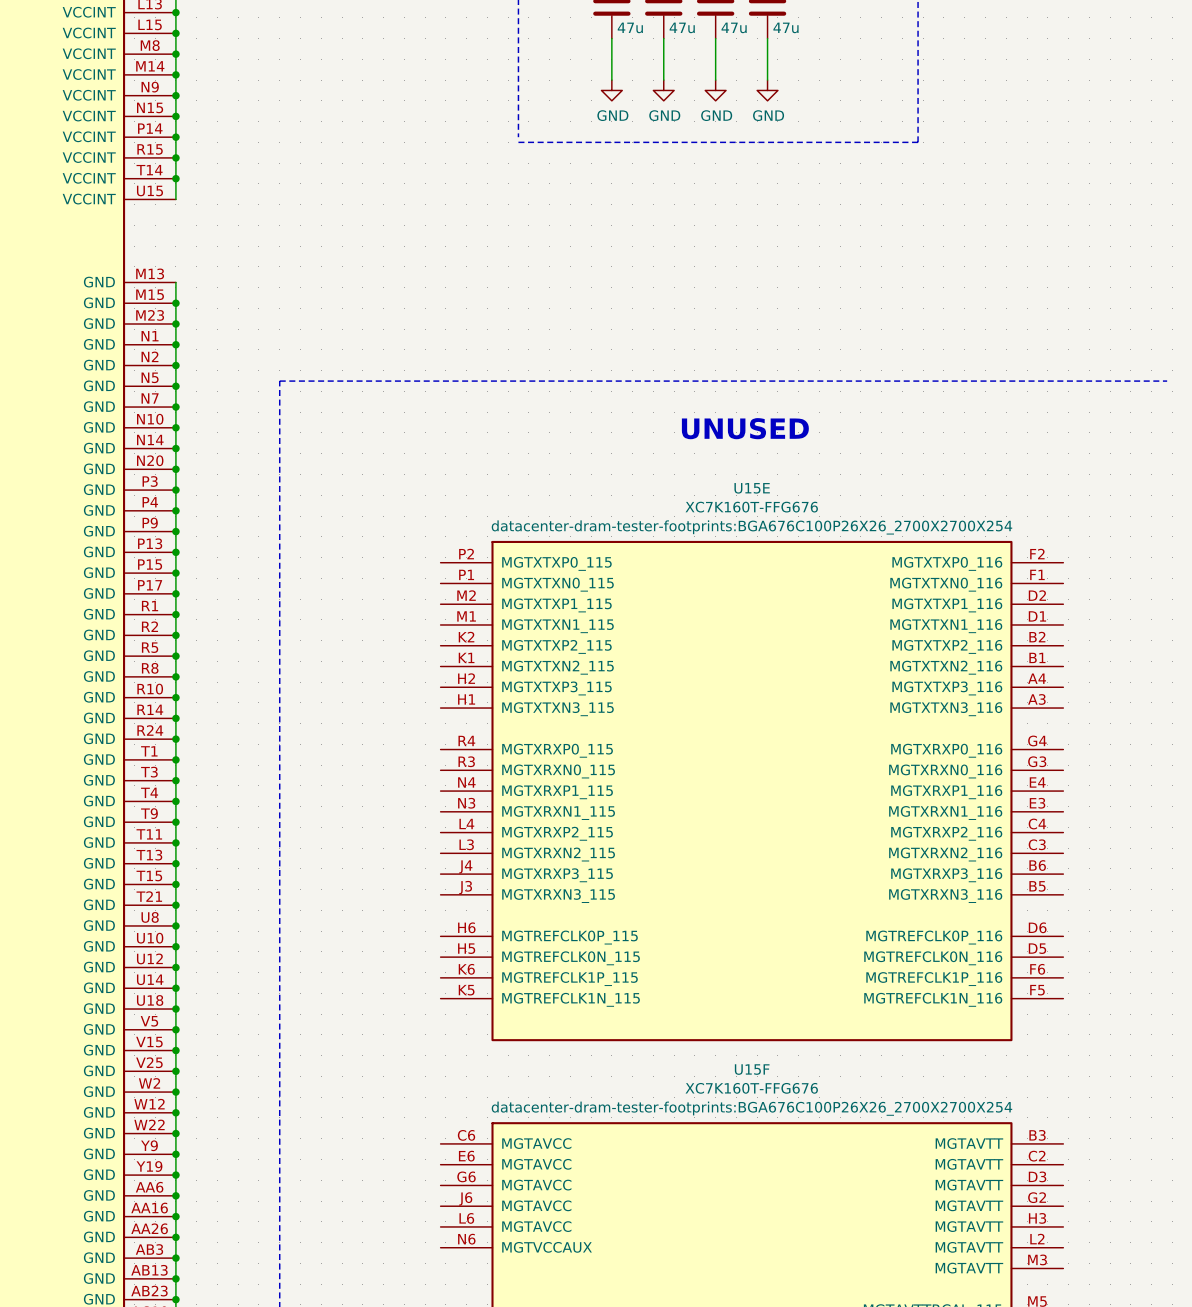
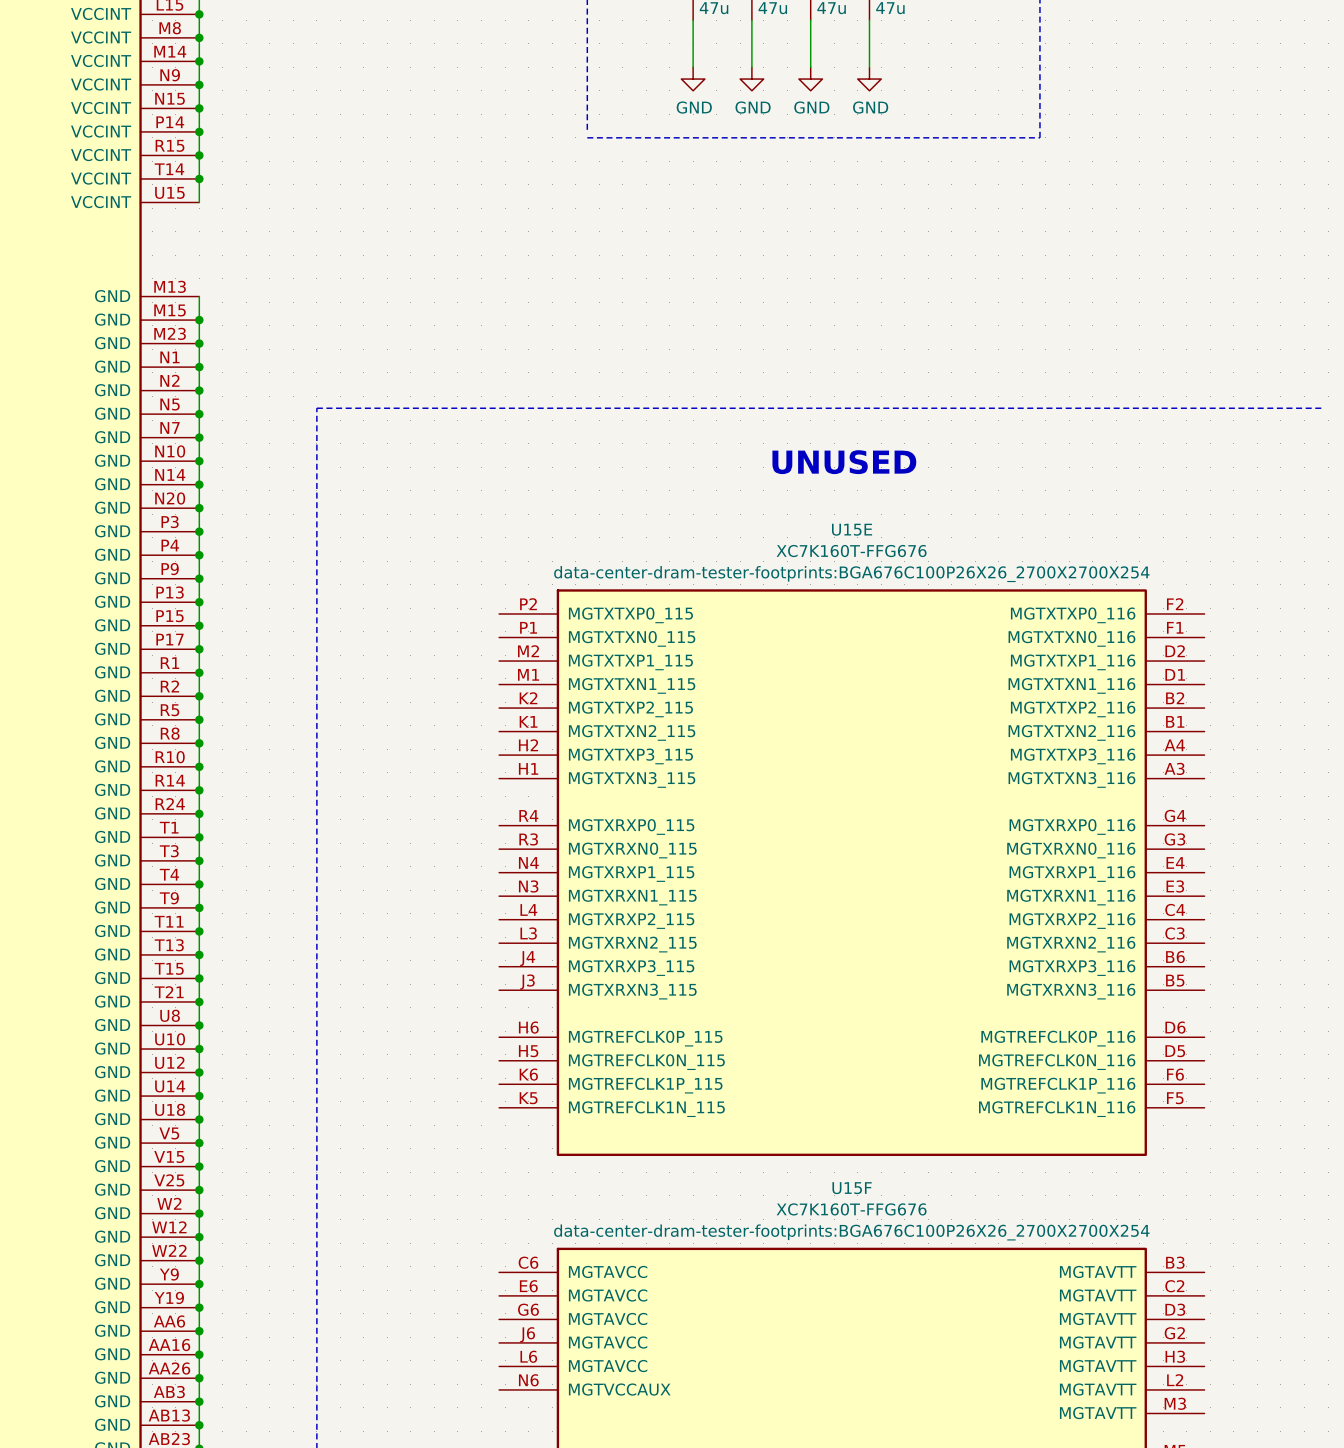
U15E text: datacenter-dram-tester-footprints:BGA676C100P26X26_2700X2700X254 (751, 527) -> data-center-dram-tester-footprints:BGA676C100P26X26_2700X2700X254 (851, 574)
U15F text: datacenter-dram-tester-footprints:BGA676C100P26X26_2700X2700X254 (751, 1108) -> data-center-dram-tester-footprints:BGA676C100P26X26_2700X2700X254 (851, 1232)

